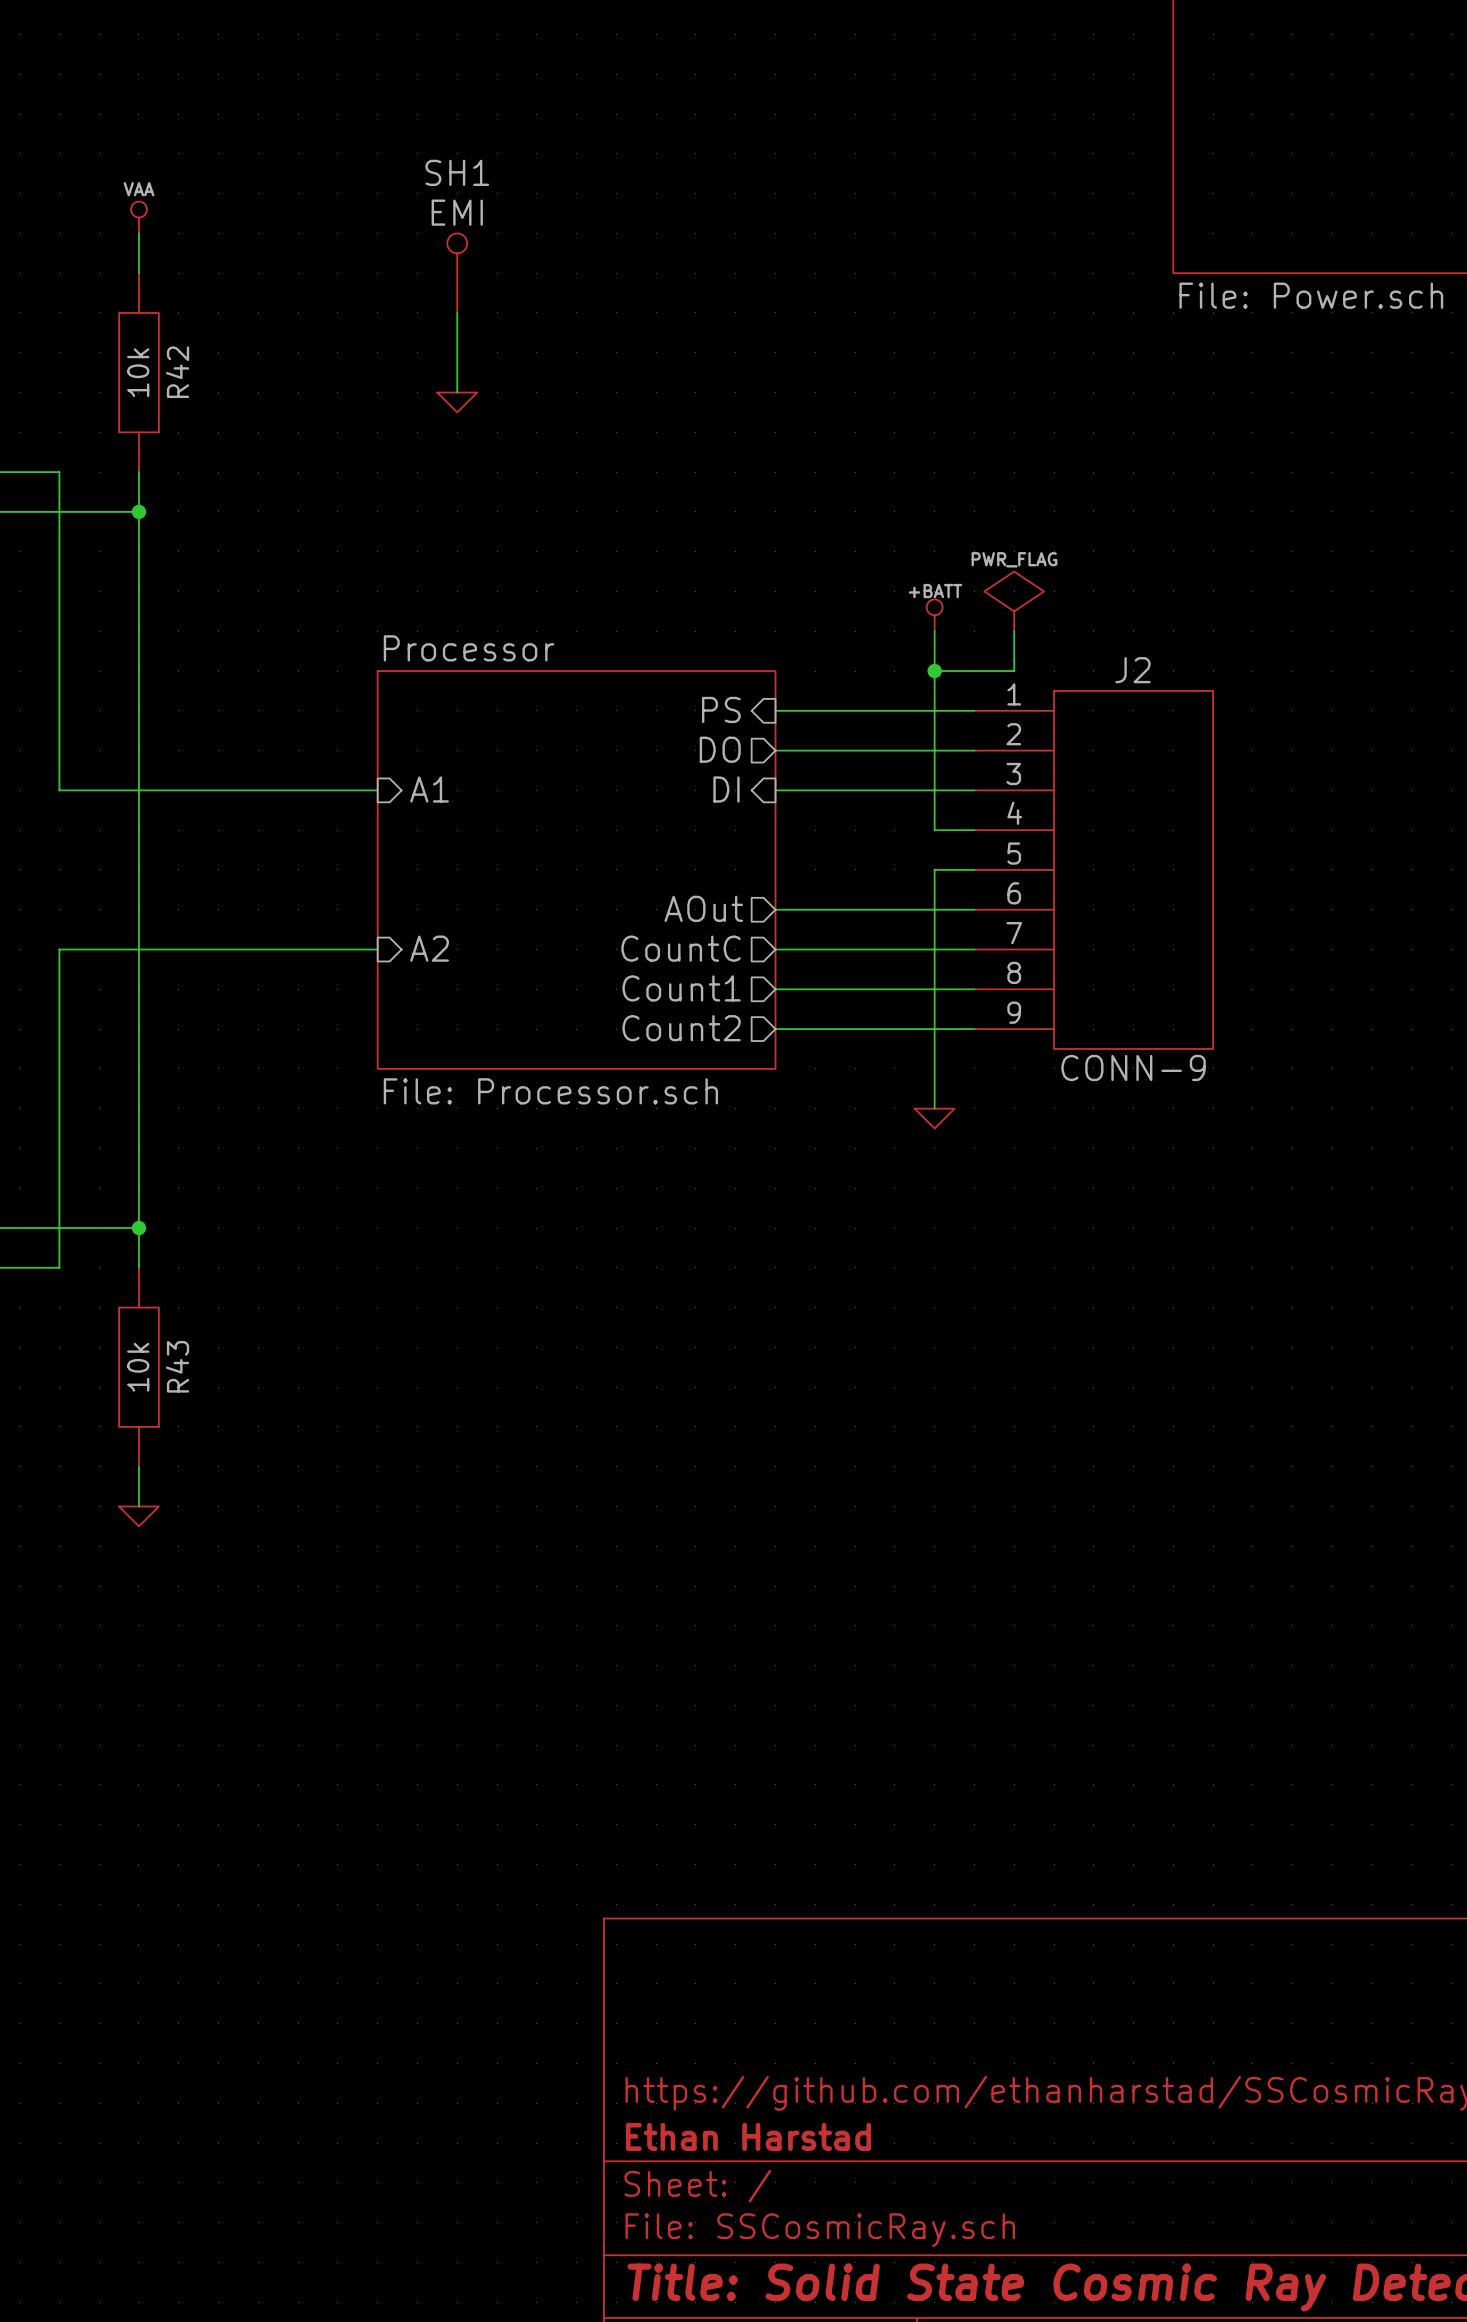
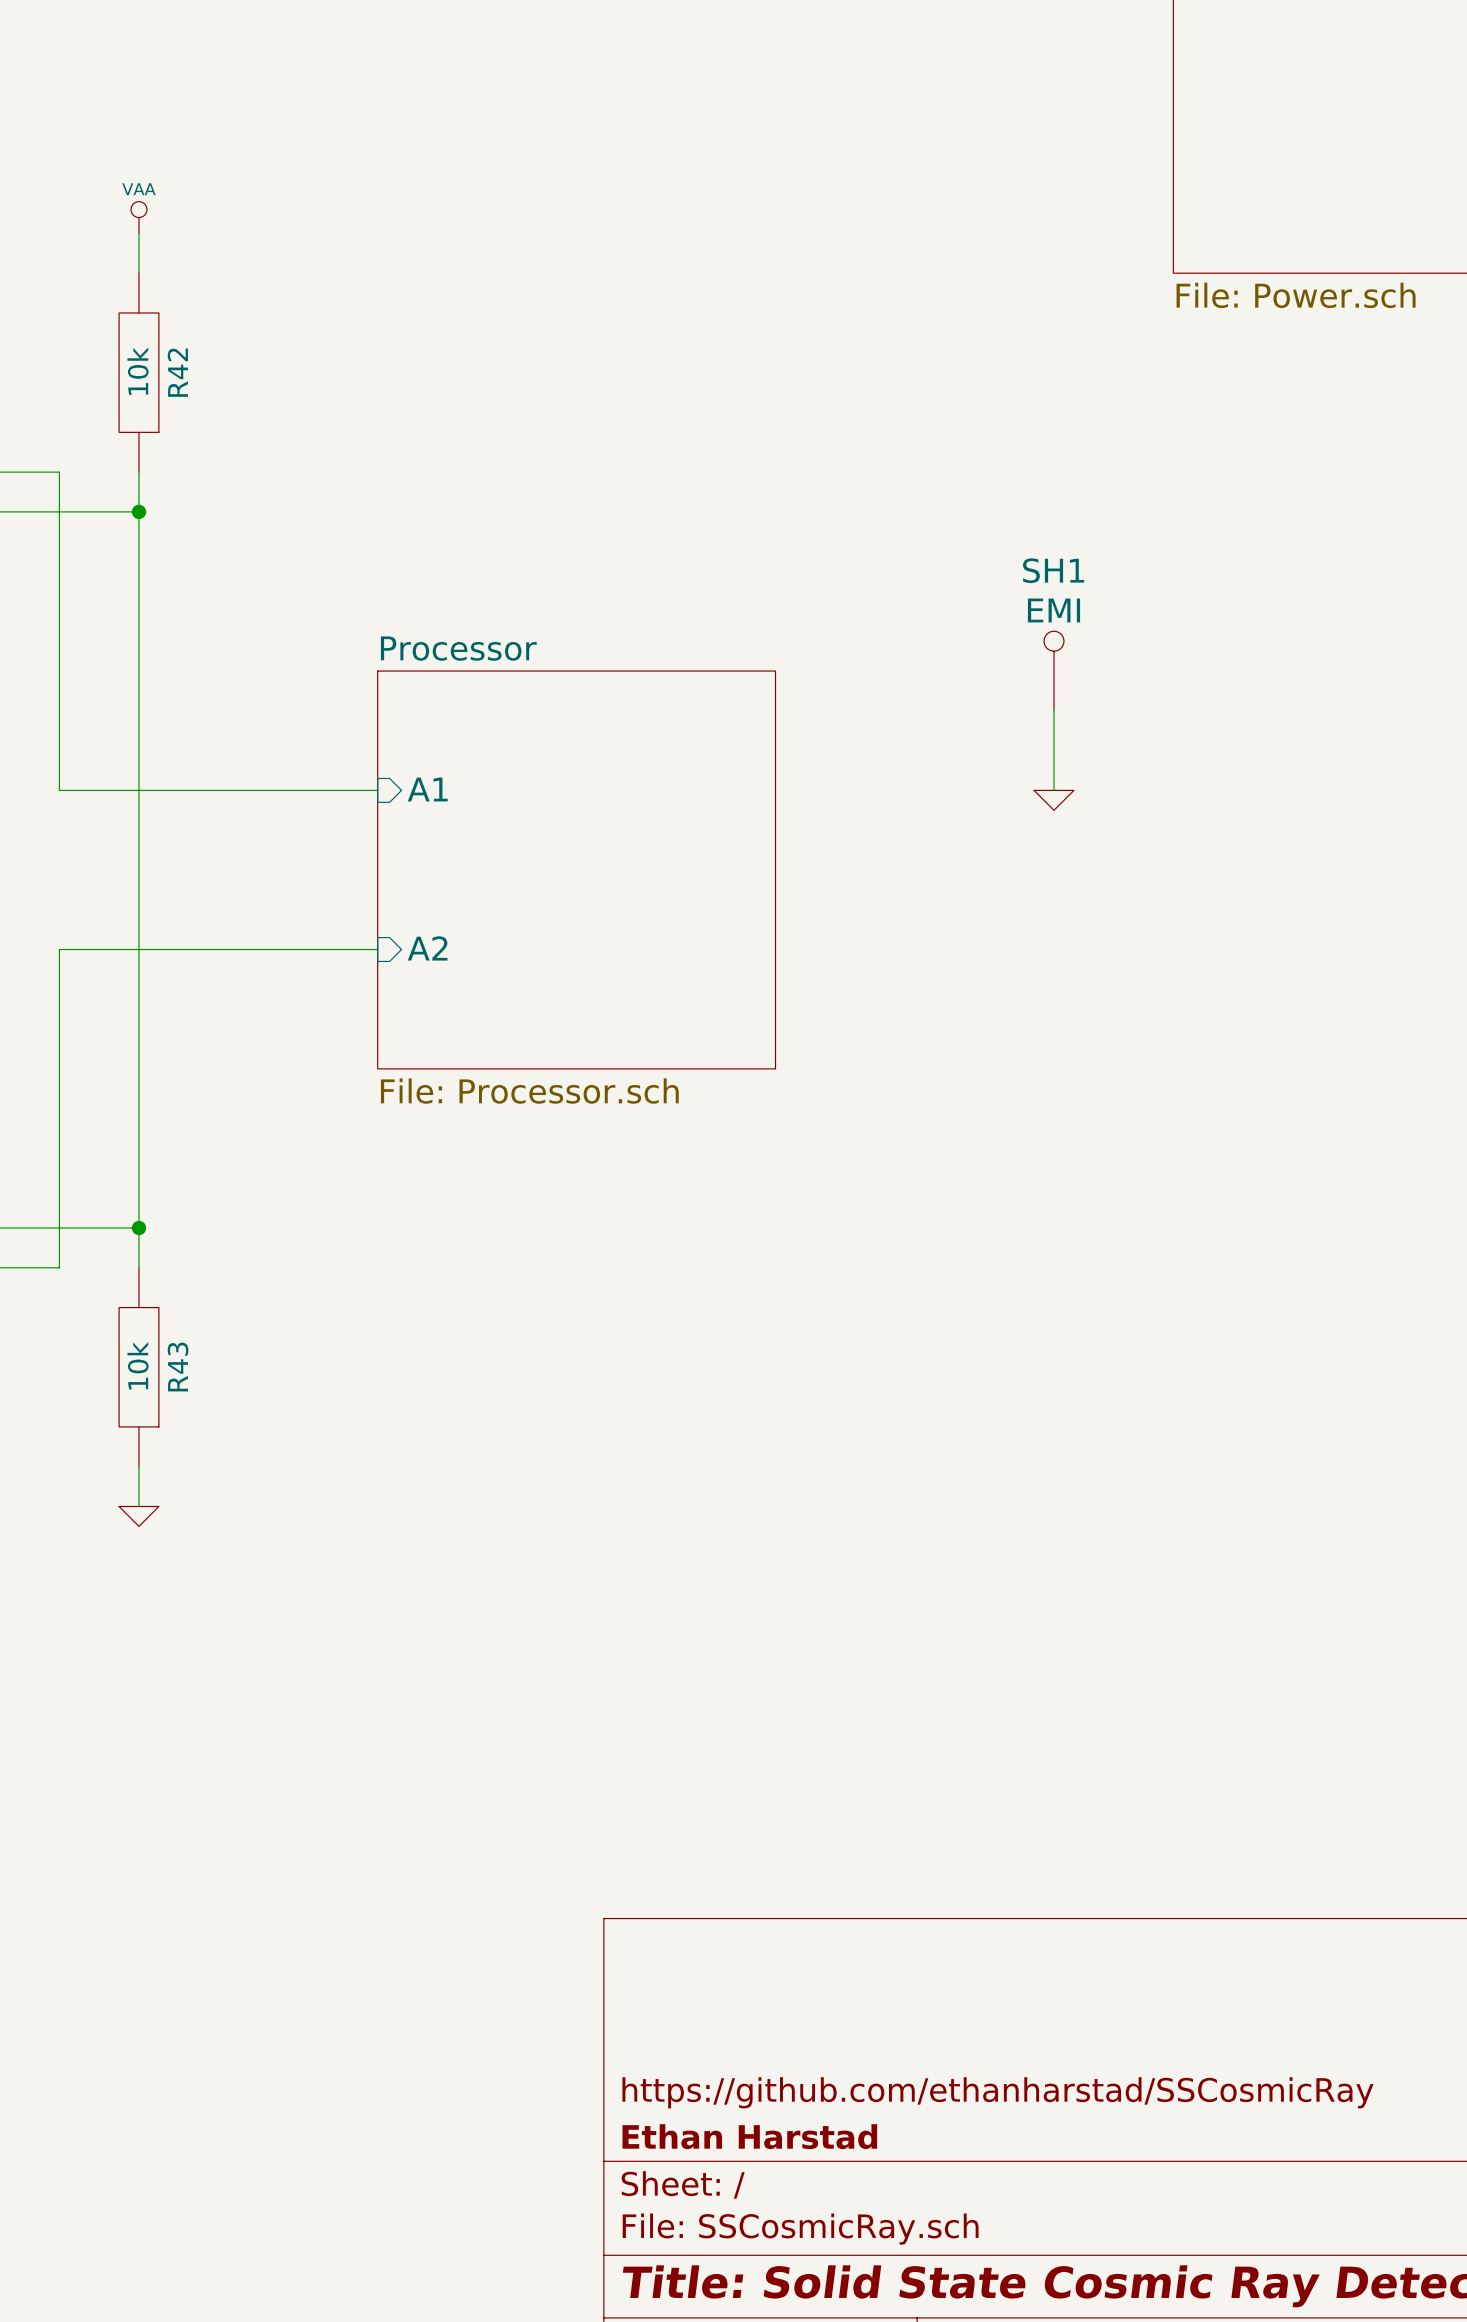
SH1 position: (457, 273) -> (1054, 671)
wire: (457, 312) (457, 392) -> none
power symbol: (457, 402) -> none
power symbol: PWR_FLAG (1014, 601) -> none
power symbol: +BATT (934, 615) -> none
wire: (934, 631) (934, 830) (974, 830) -> none
wire: (1014, 631) (1014, 671) (934, 671) -> none
junction: (934, 671) -> none
sheet pin: PS (721, 709) -> none
wire: (775, 710) (974, 710) -> none
sheet pin: DO (720, 749) -> none
wire: (775, 750) (974, 750) -> none
sheet pin: DI (726, 789) -> none
wire: (775, 790) (974, 790) -> none
wire: (974, 869) (934, 869) (934, 1108) -> none
J2: CONN-9 (1093, 869) -> none
sheet pin: AOut (703, 908) -> none
wire: (775, 909) (974, 909) -> none
sheet pin: CountC (681, 948) -> none
wire: (775, 949) (974, 949) -> none
sheet pin: Count1 (681, 988) -> none
wire: (775, 989) (974, 989) -> none
sheet pin: Count2 (681, 1028) -> none
wire: (775, 1029) (974, 1029) -> none
power symbol position: (934, 1118) -> (1054, 800)

